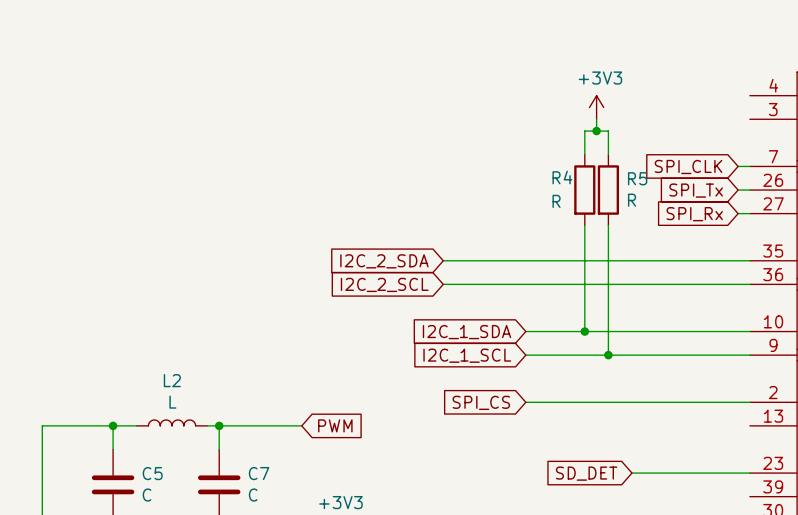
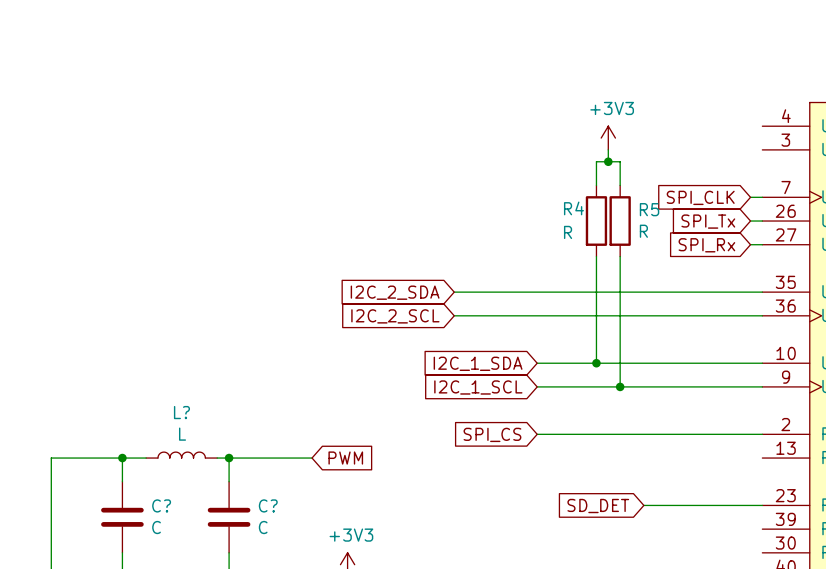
L2 name: L2 (172, 380) -> L? (181, 412)
C5 name: C5 (152, 473) -> C? (161, 505)
C7 name: C7 (259, 473) -> C? (268, 505)

